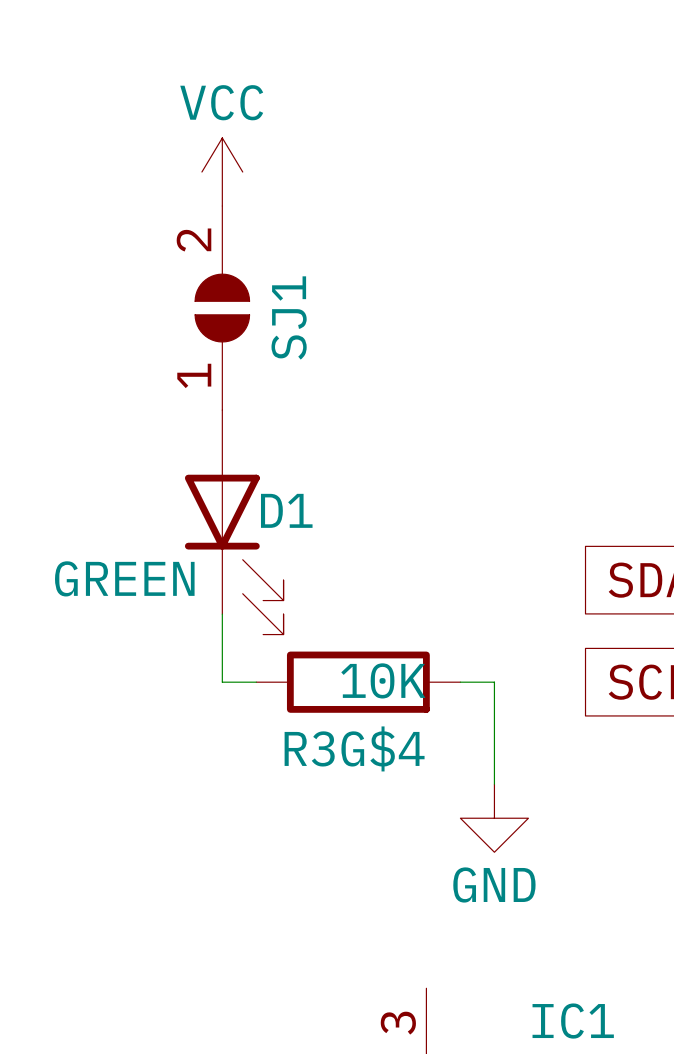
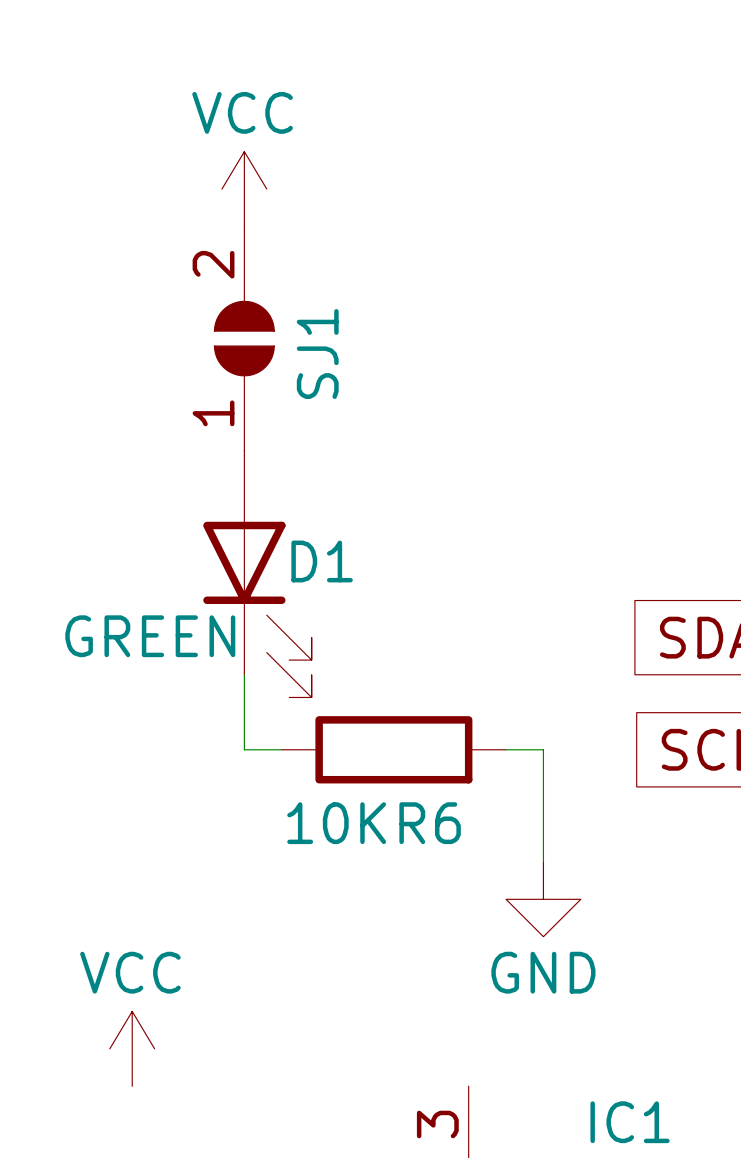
R3G$4 value position: 10K (383, 680) -> 10K (336, 823)
R3G$4 name: R3G$4 (354, 748) -> R6 (430, 823)
power symbol: none -> VCC (132, 1048)

